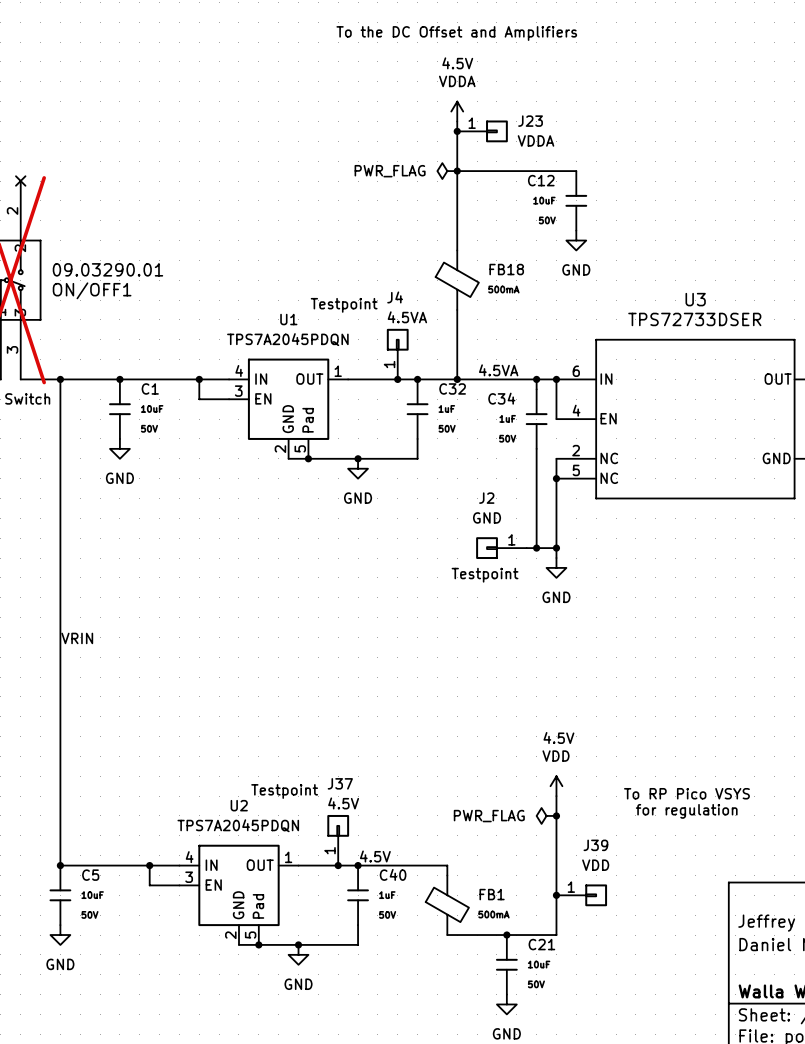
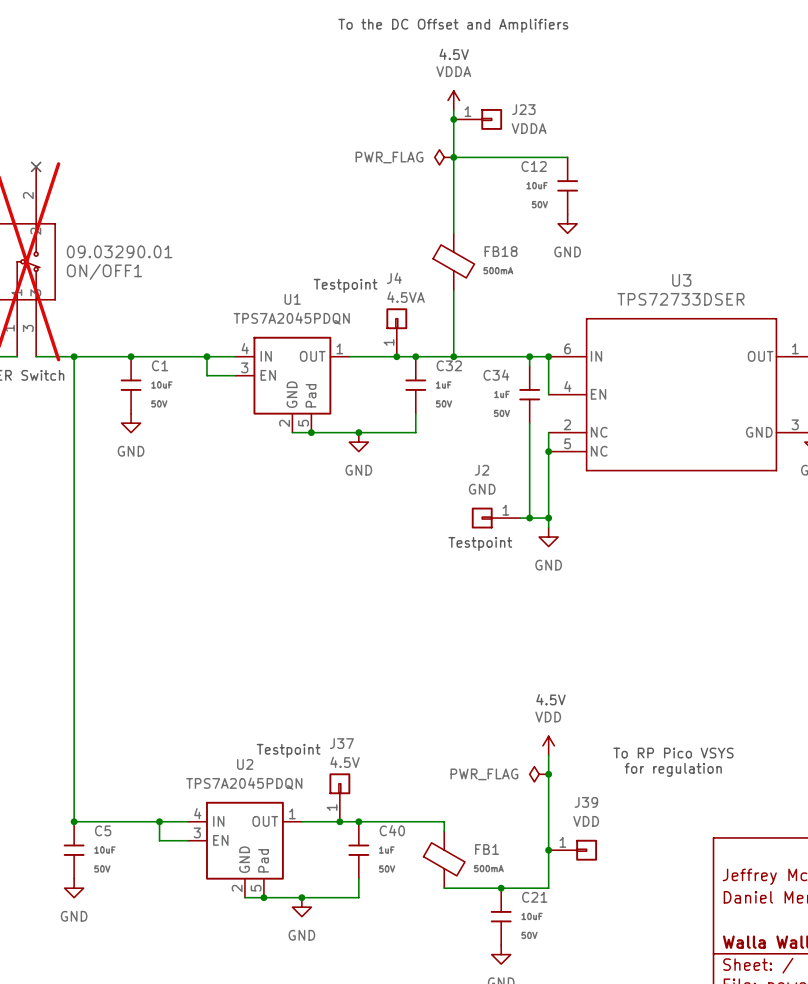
label: 4.5VA (498, 370) -> none
label: VRIN (77, 638) -> none
label: 4.5V (375, 856) -> none

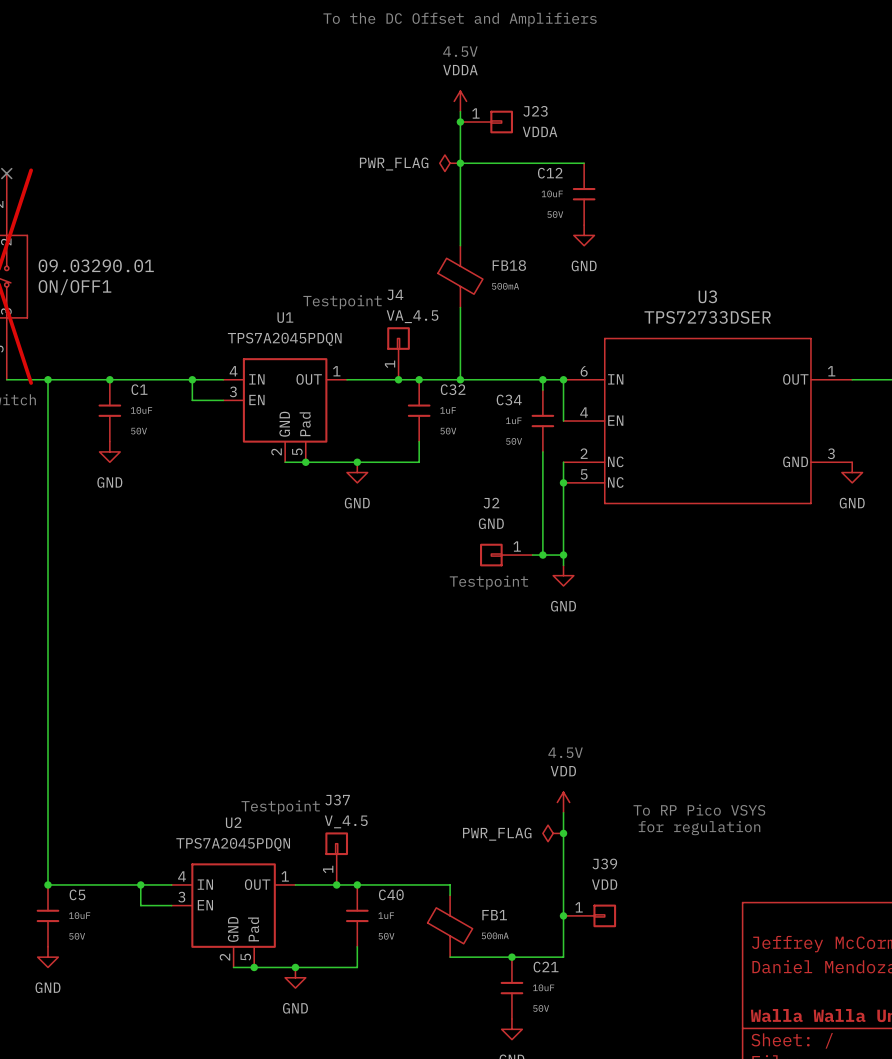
J4 value: 4.5VA (406, 297) -> VA_4.5 (412, 316)
J37 value: 4.5V (345, 762) -> V_4.5 (346, 821)

